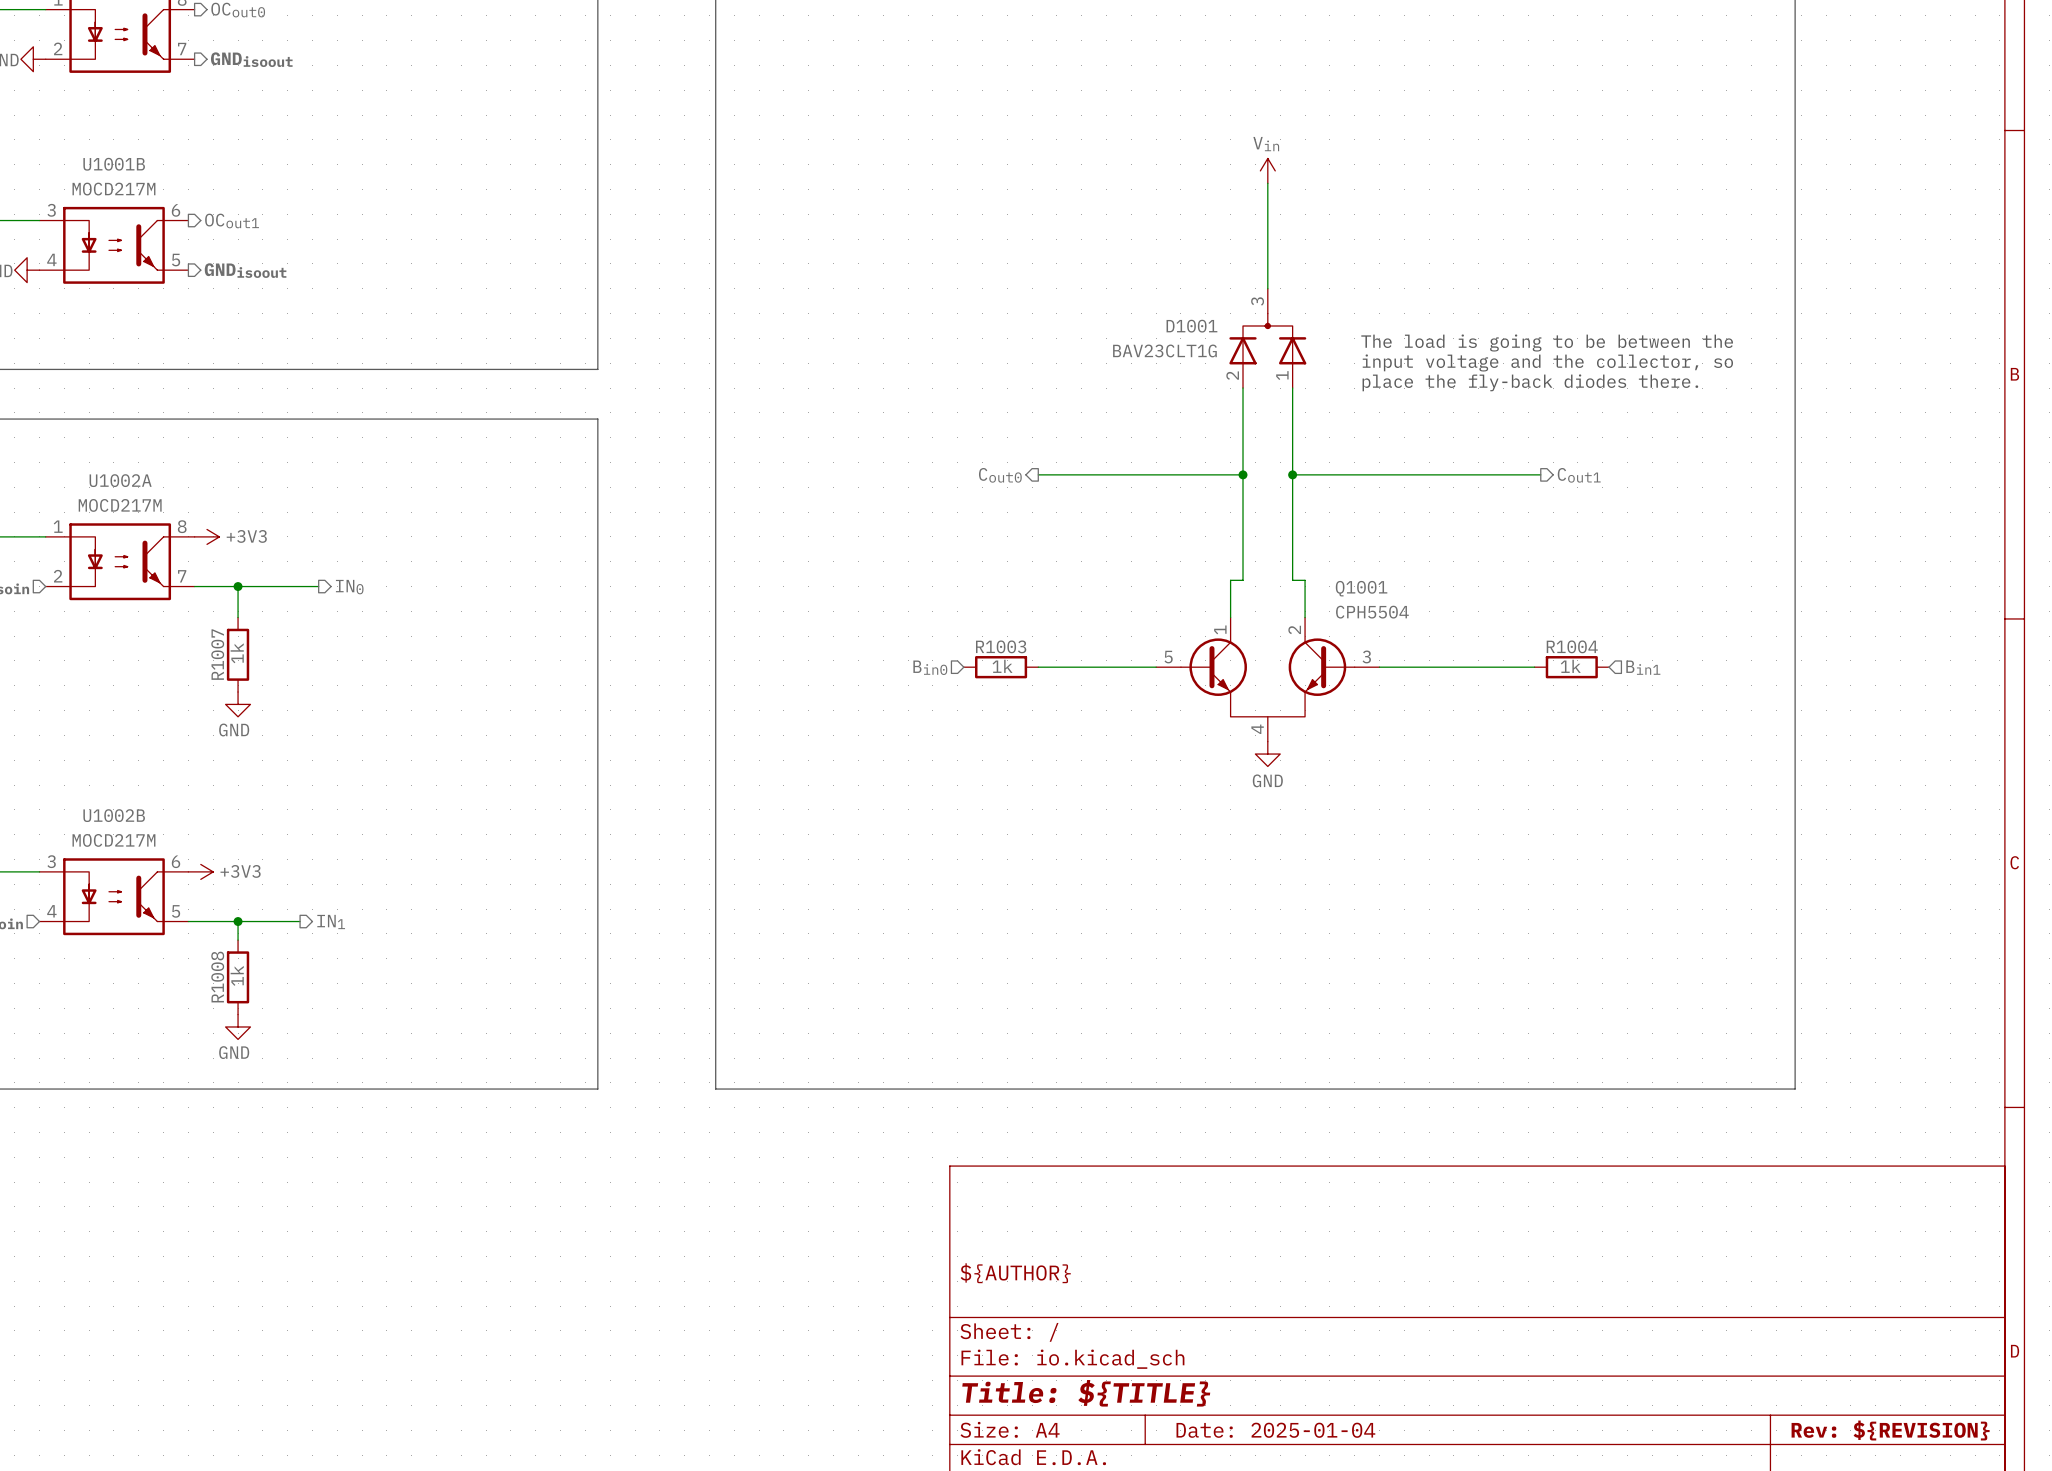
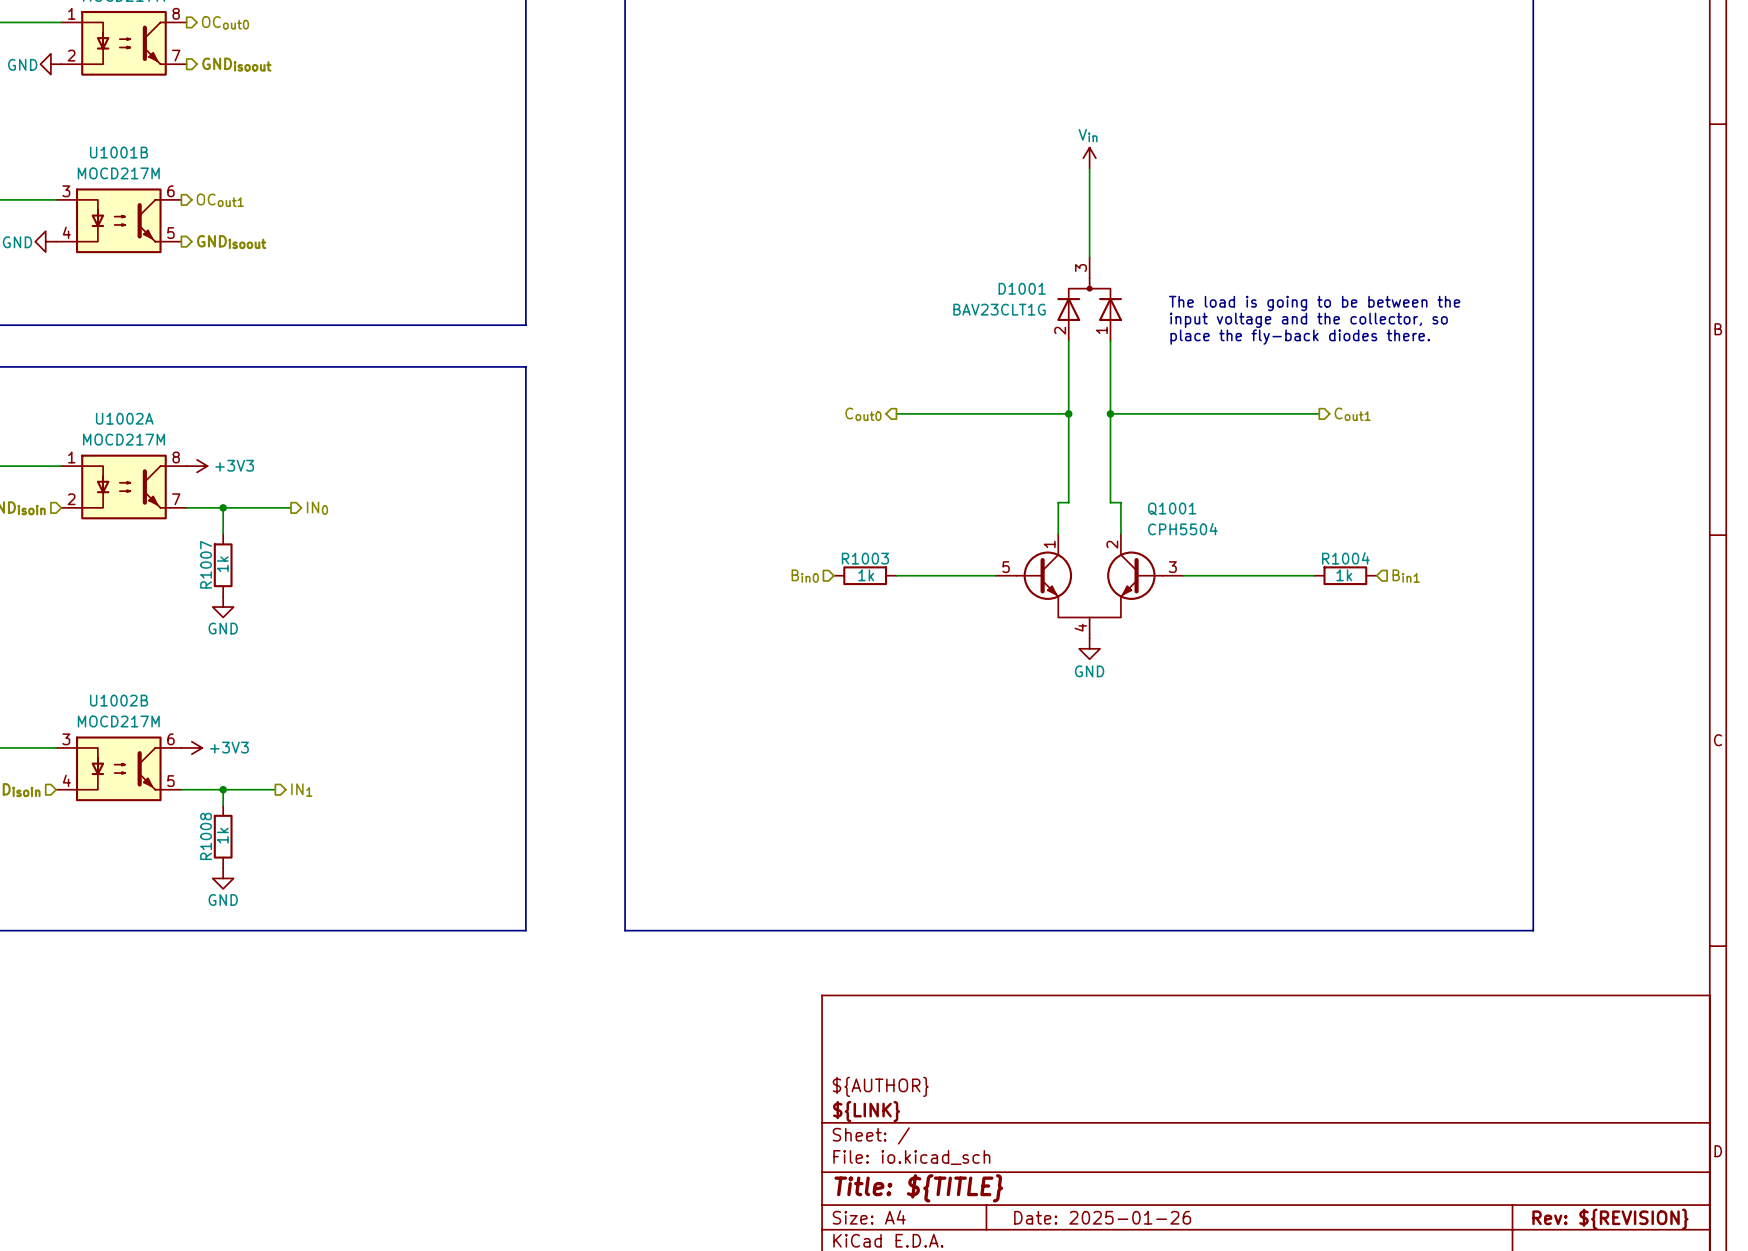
title block: none -> ${LINK} (866, 1111)
title block: Date: 2025-01-04 (1275, 1430) -> Date: 2025-01-26 (1102, 1217)

